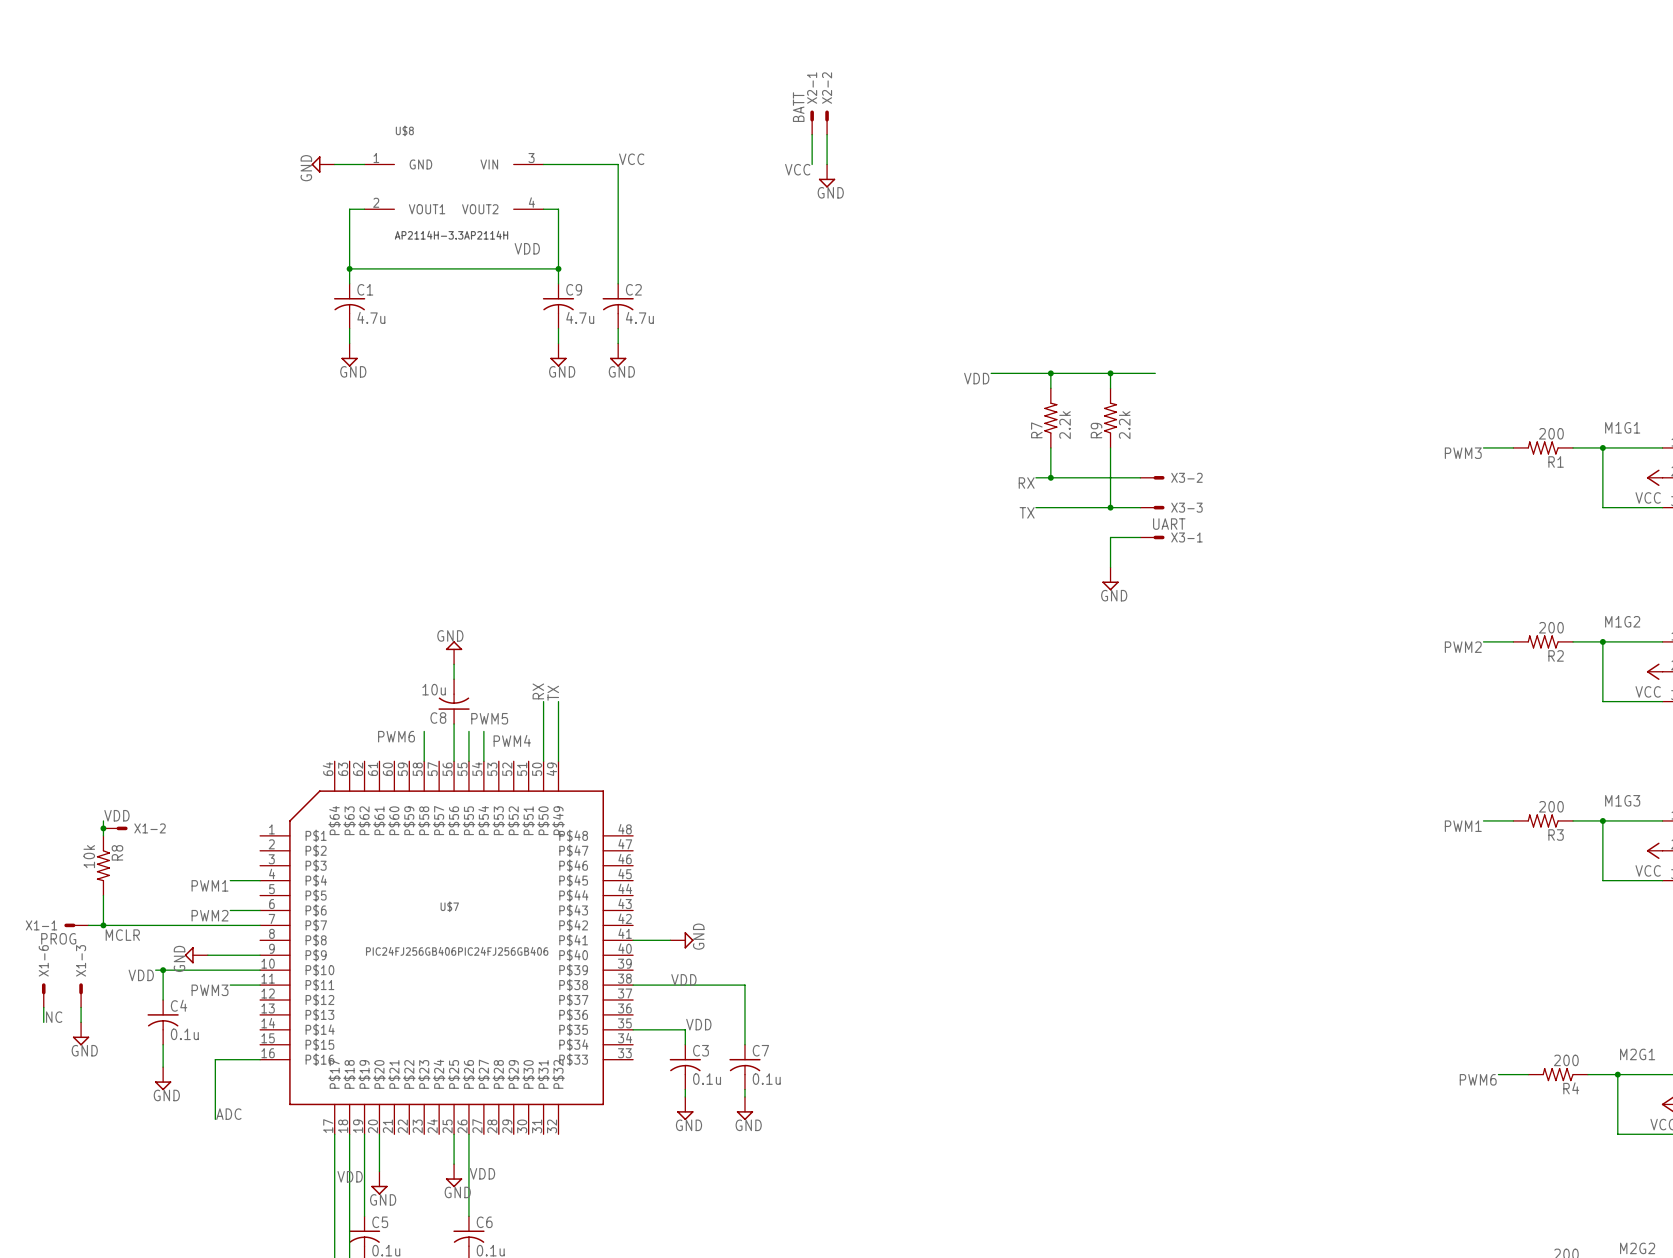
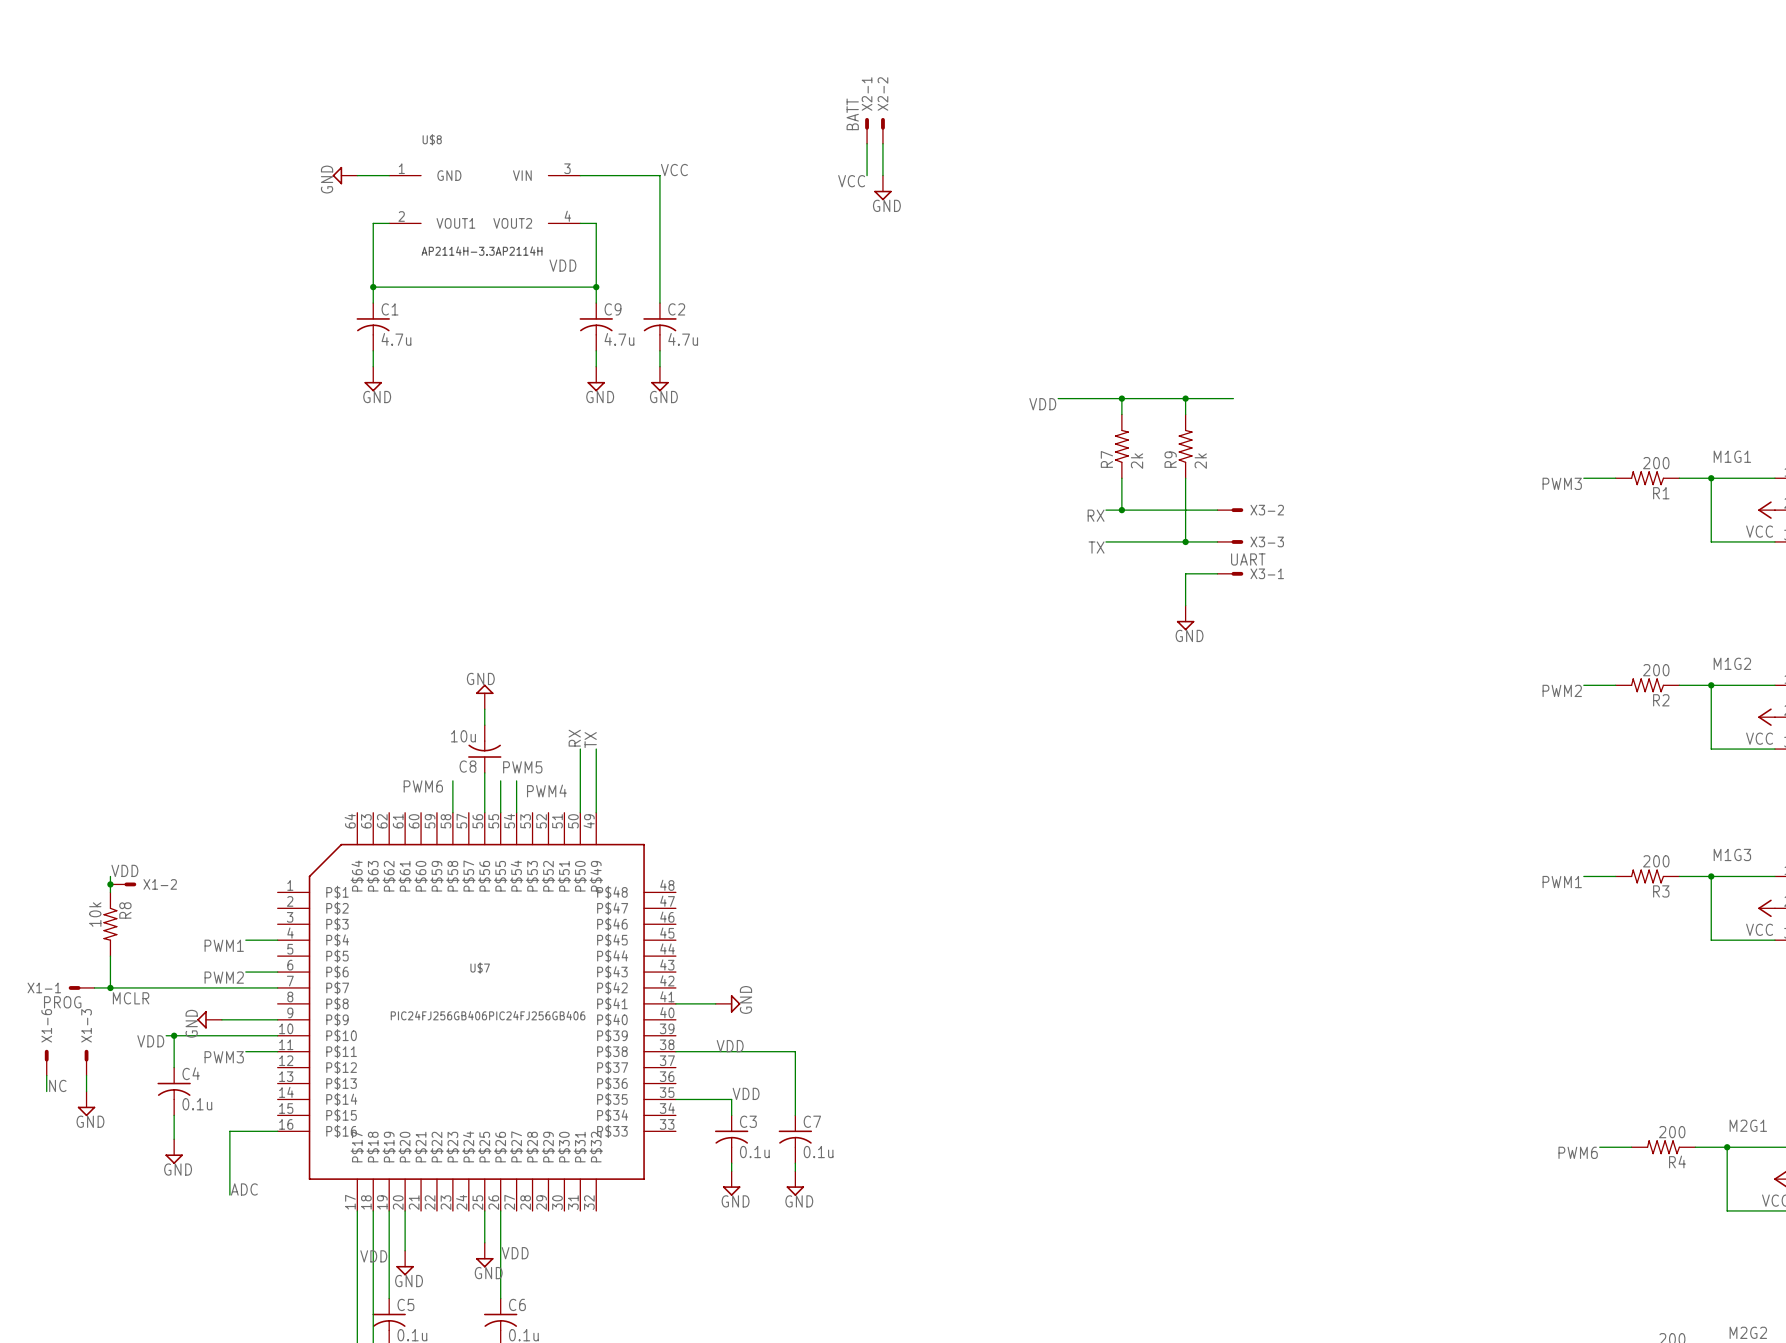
R7 value: 2.2k (1065, 425) -> 2k (1137, 461)
R9 value: 2.2k (1124, 425) -> 2k (1200, 461)

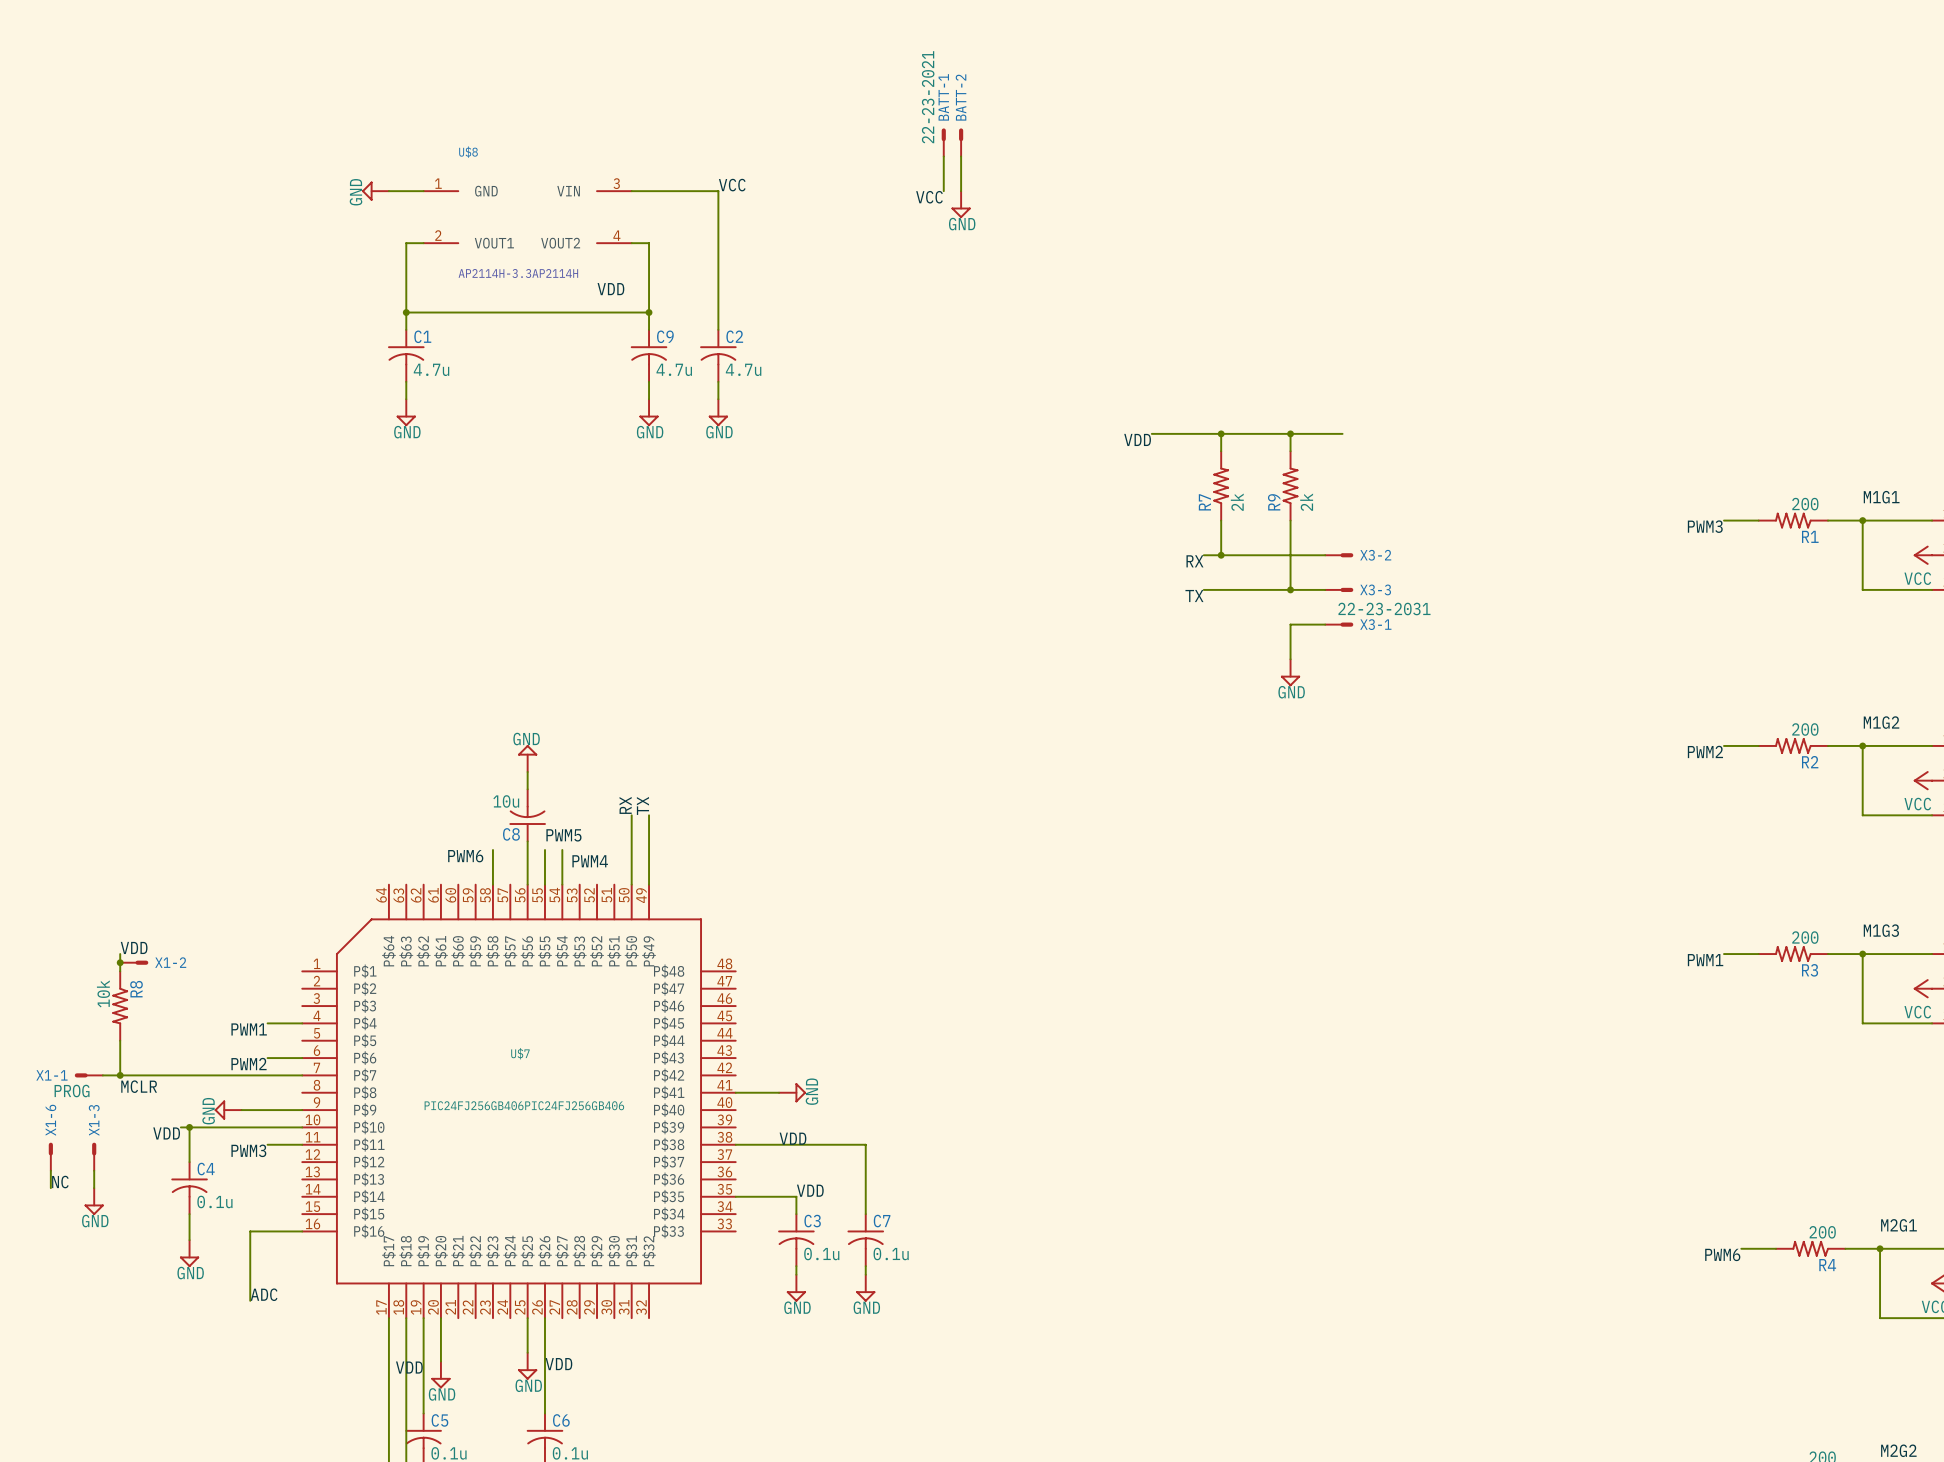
X2-1 name: X2-1 (867, 93) -> BATT-1 (943, 97)
X2-2 name: X2-2 (882, 93) -> BATT-2 (961, 97)
X2-1 value: BATT (852, 114) -> 22-23-2021 (928, 97)
X3-1 value: UART (1248, 559) -> 22-23-2031 (1384, 609)

